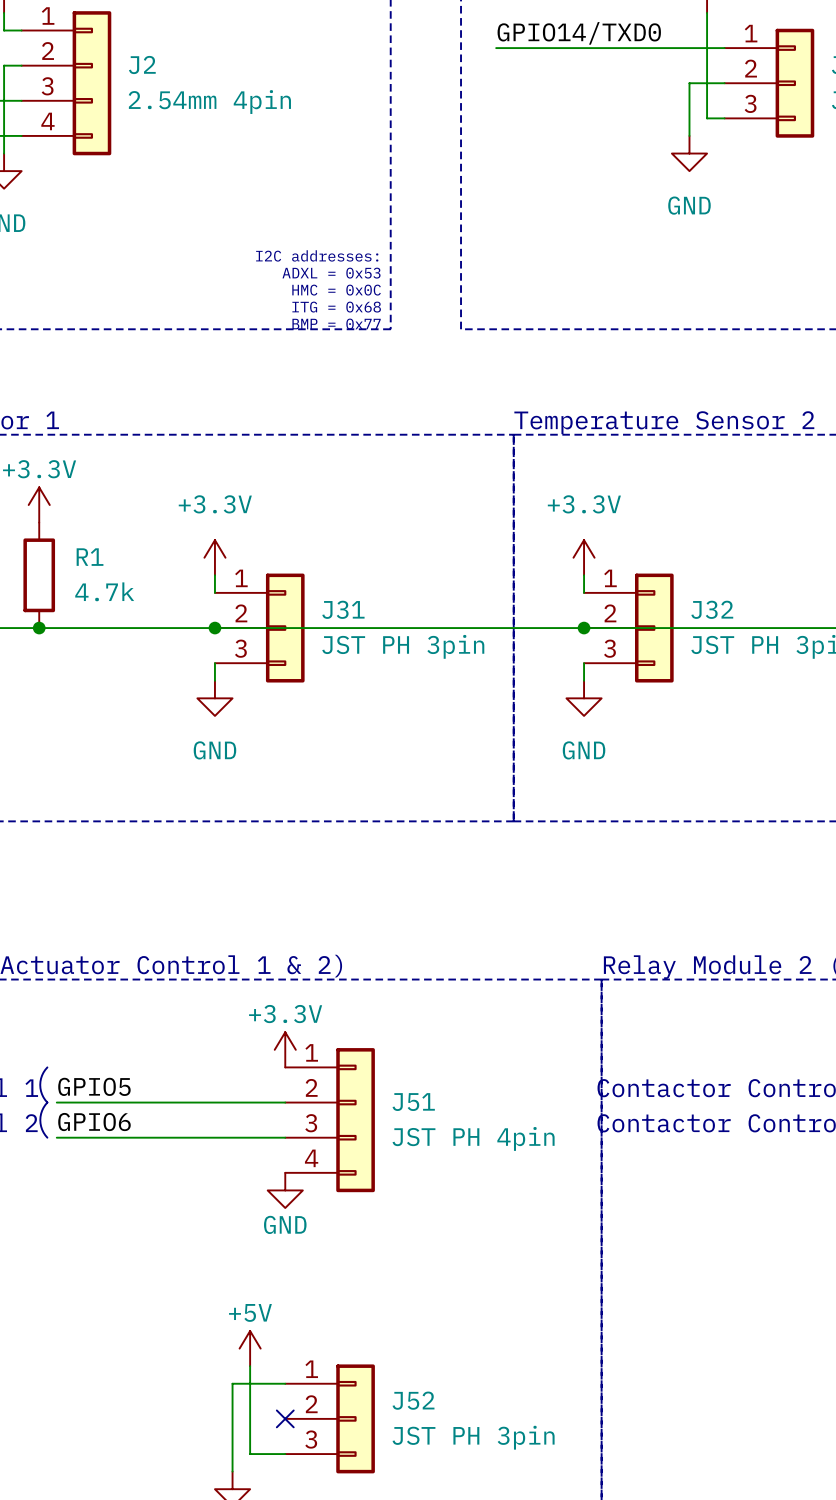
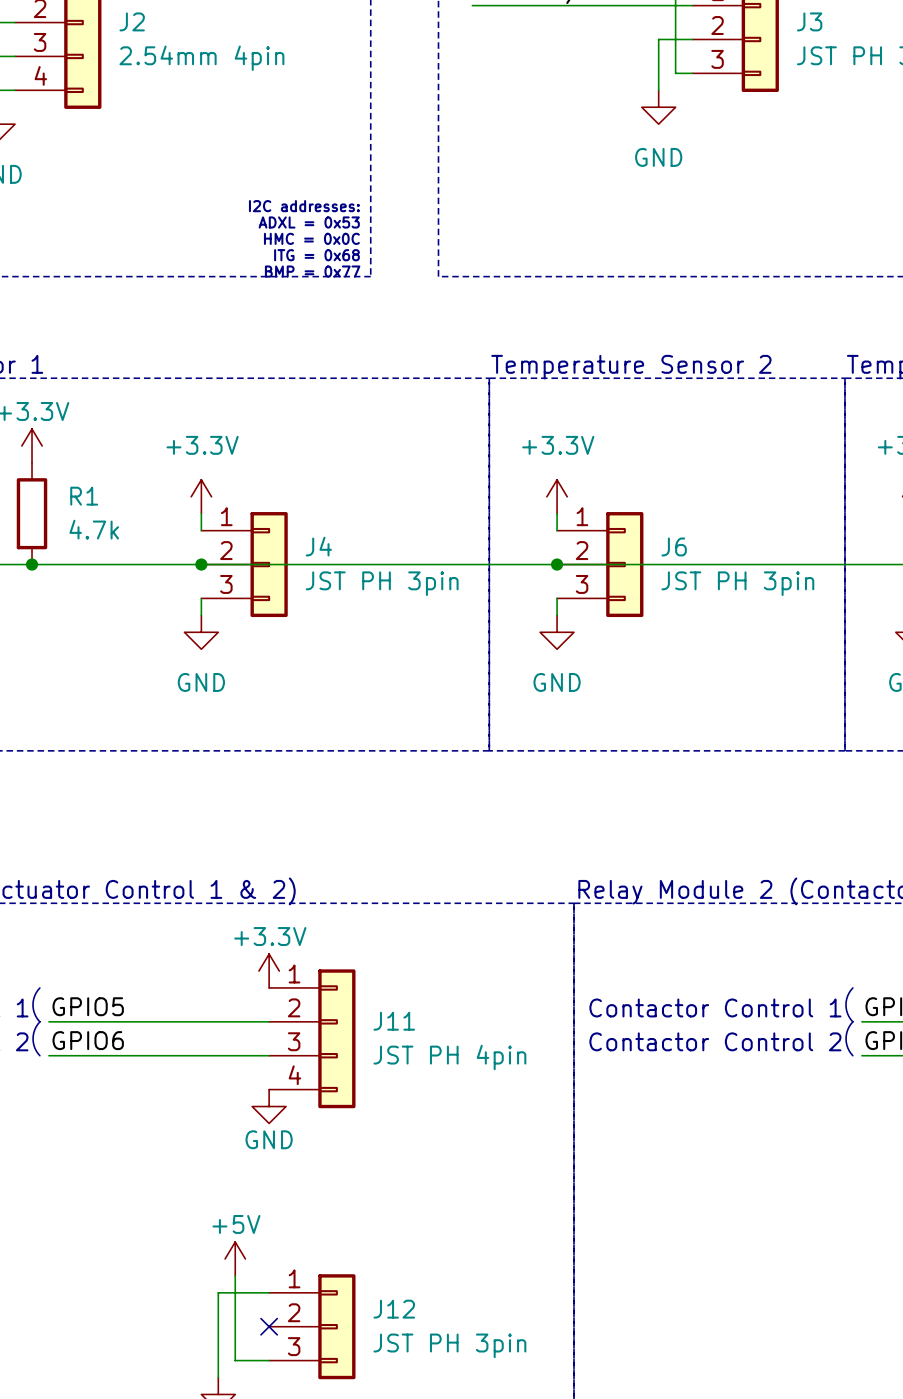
J31 name: J31 (343, 609) -> J4 (318, 546)
J32 name: J32 (712, 609) -> J6 (674, 546)
J51 name: J51 (413, 1102) -> J11 (394, 1021)
J52 name: J52 (413, 1400) -> J12 (394, 1309)

